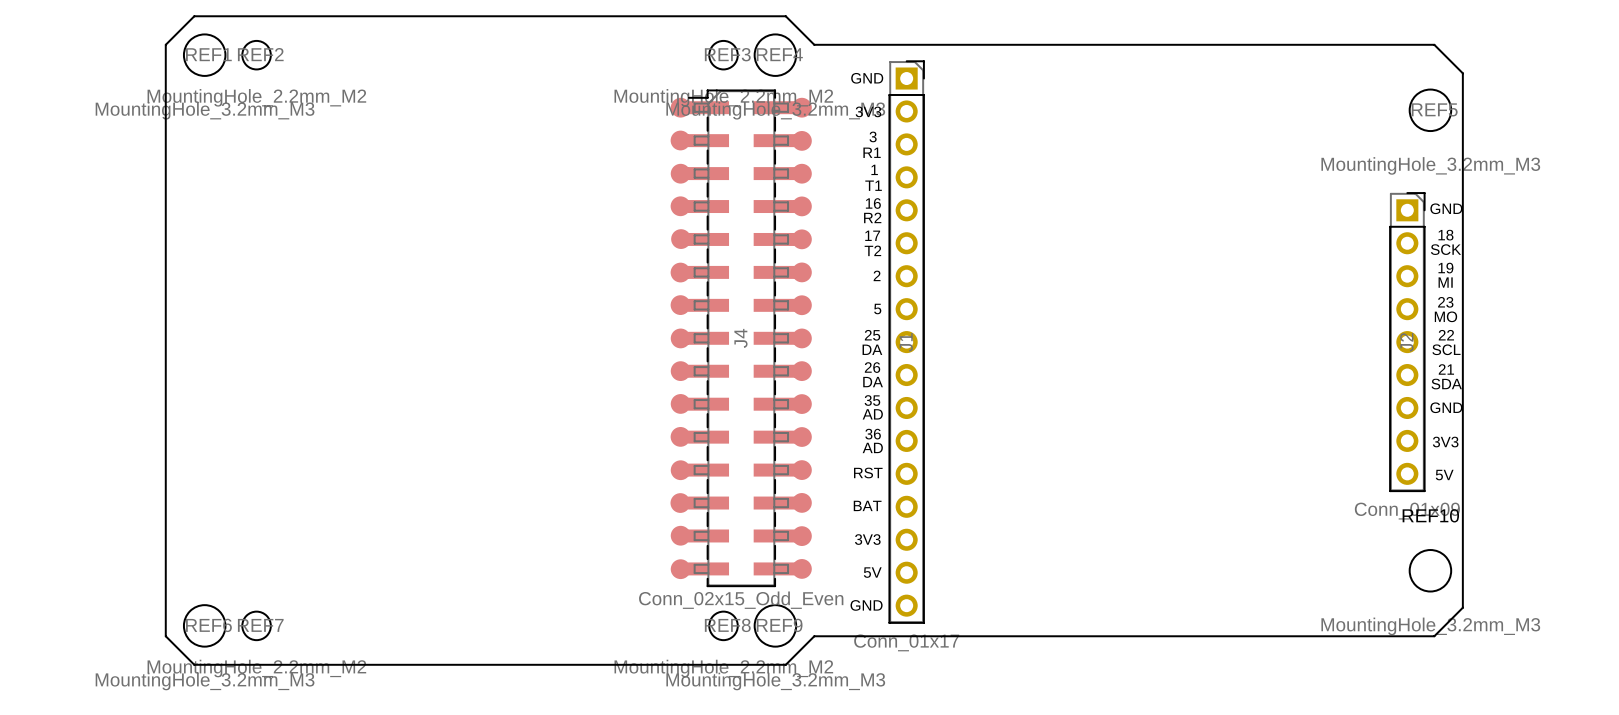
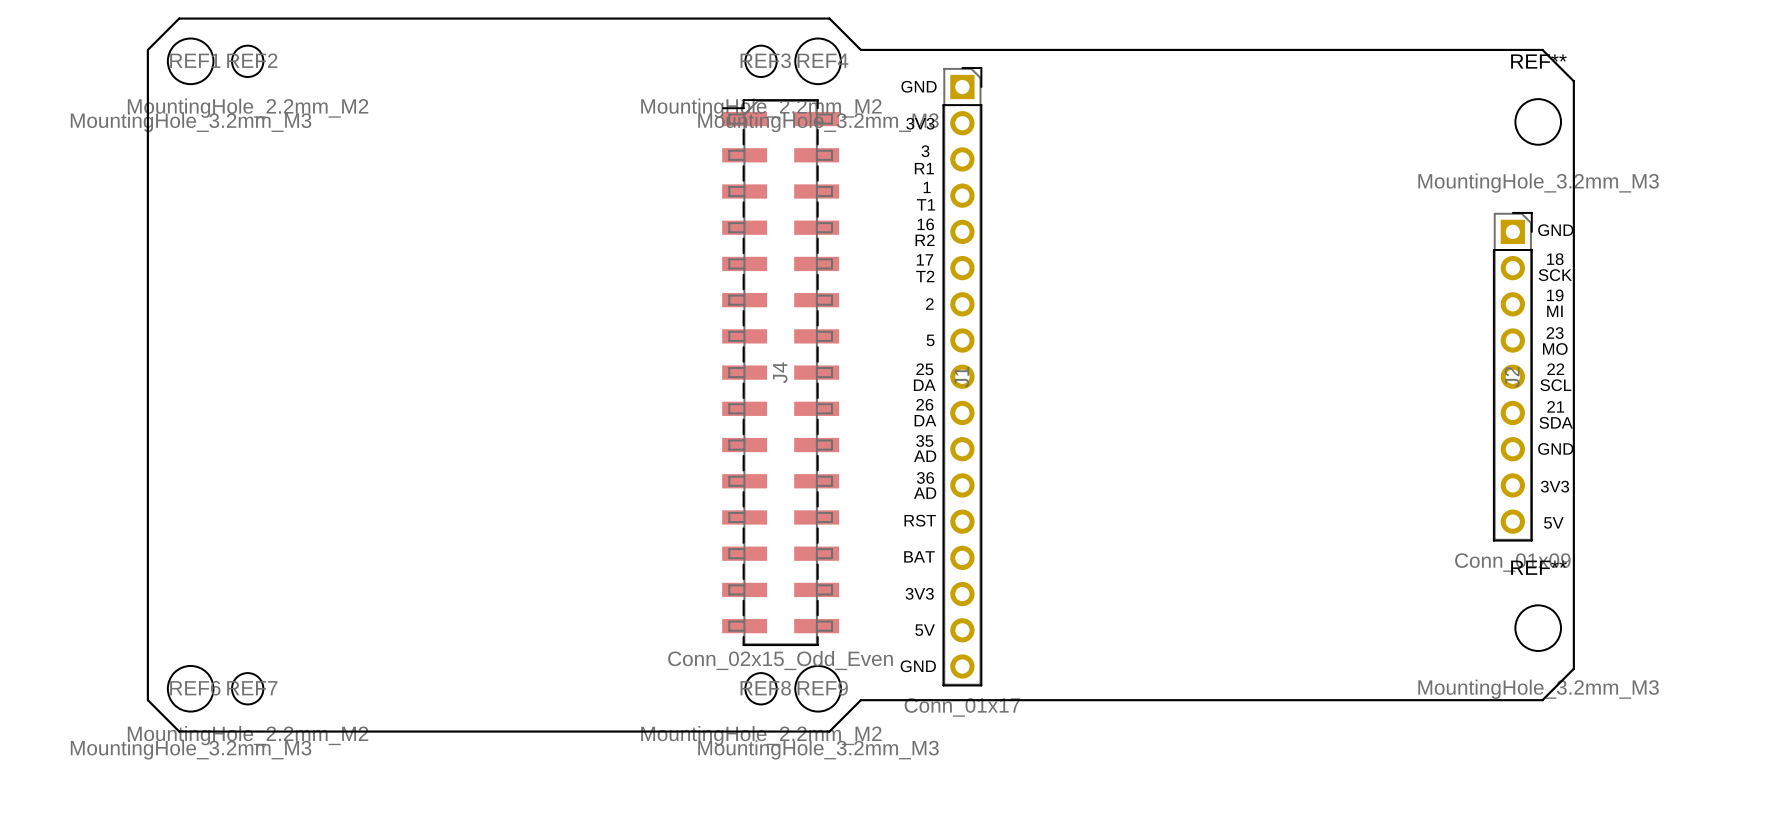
J4 footprint: [670, 89, 812, 587] -> [722, 99, 840, 646]
REF5 name: REF5 (1434, 109) -> REF** (1538, 61)
REF10 name: REF10 (1430, 515) -> REF** (1538, 567)

